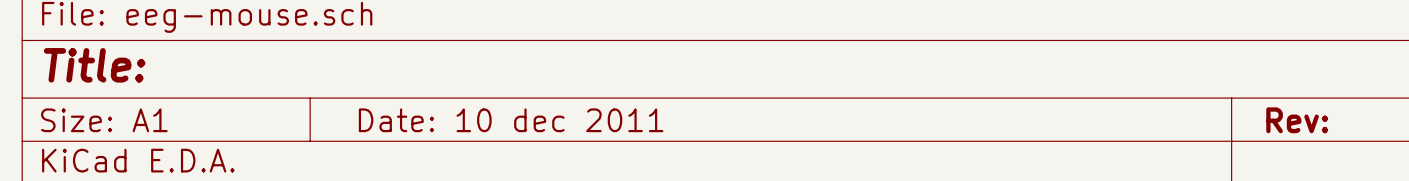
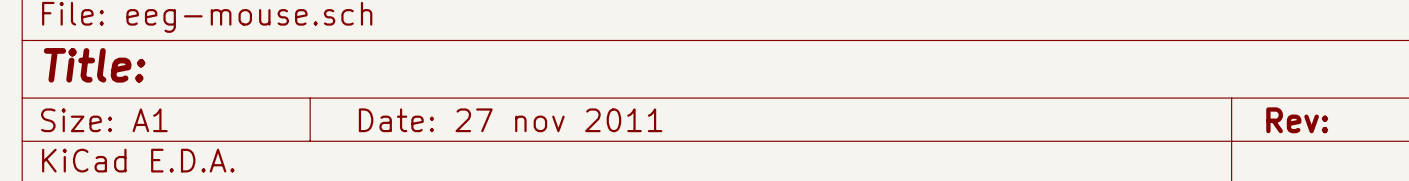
title block: Date: 10 dec 2011 (511, 120) -> Date: 27 nov 2011 (510, 120)

